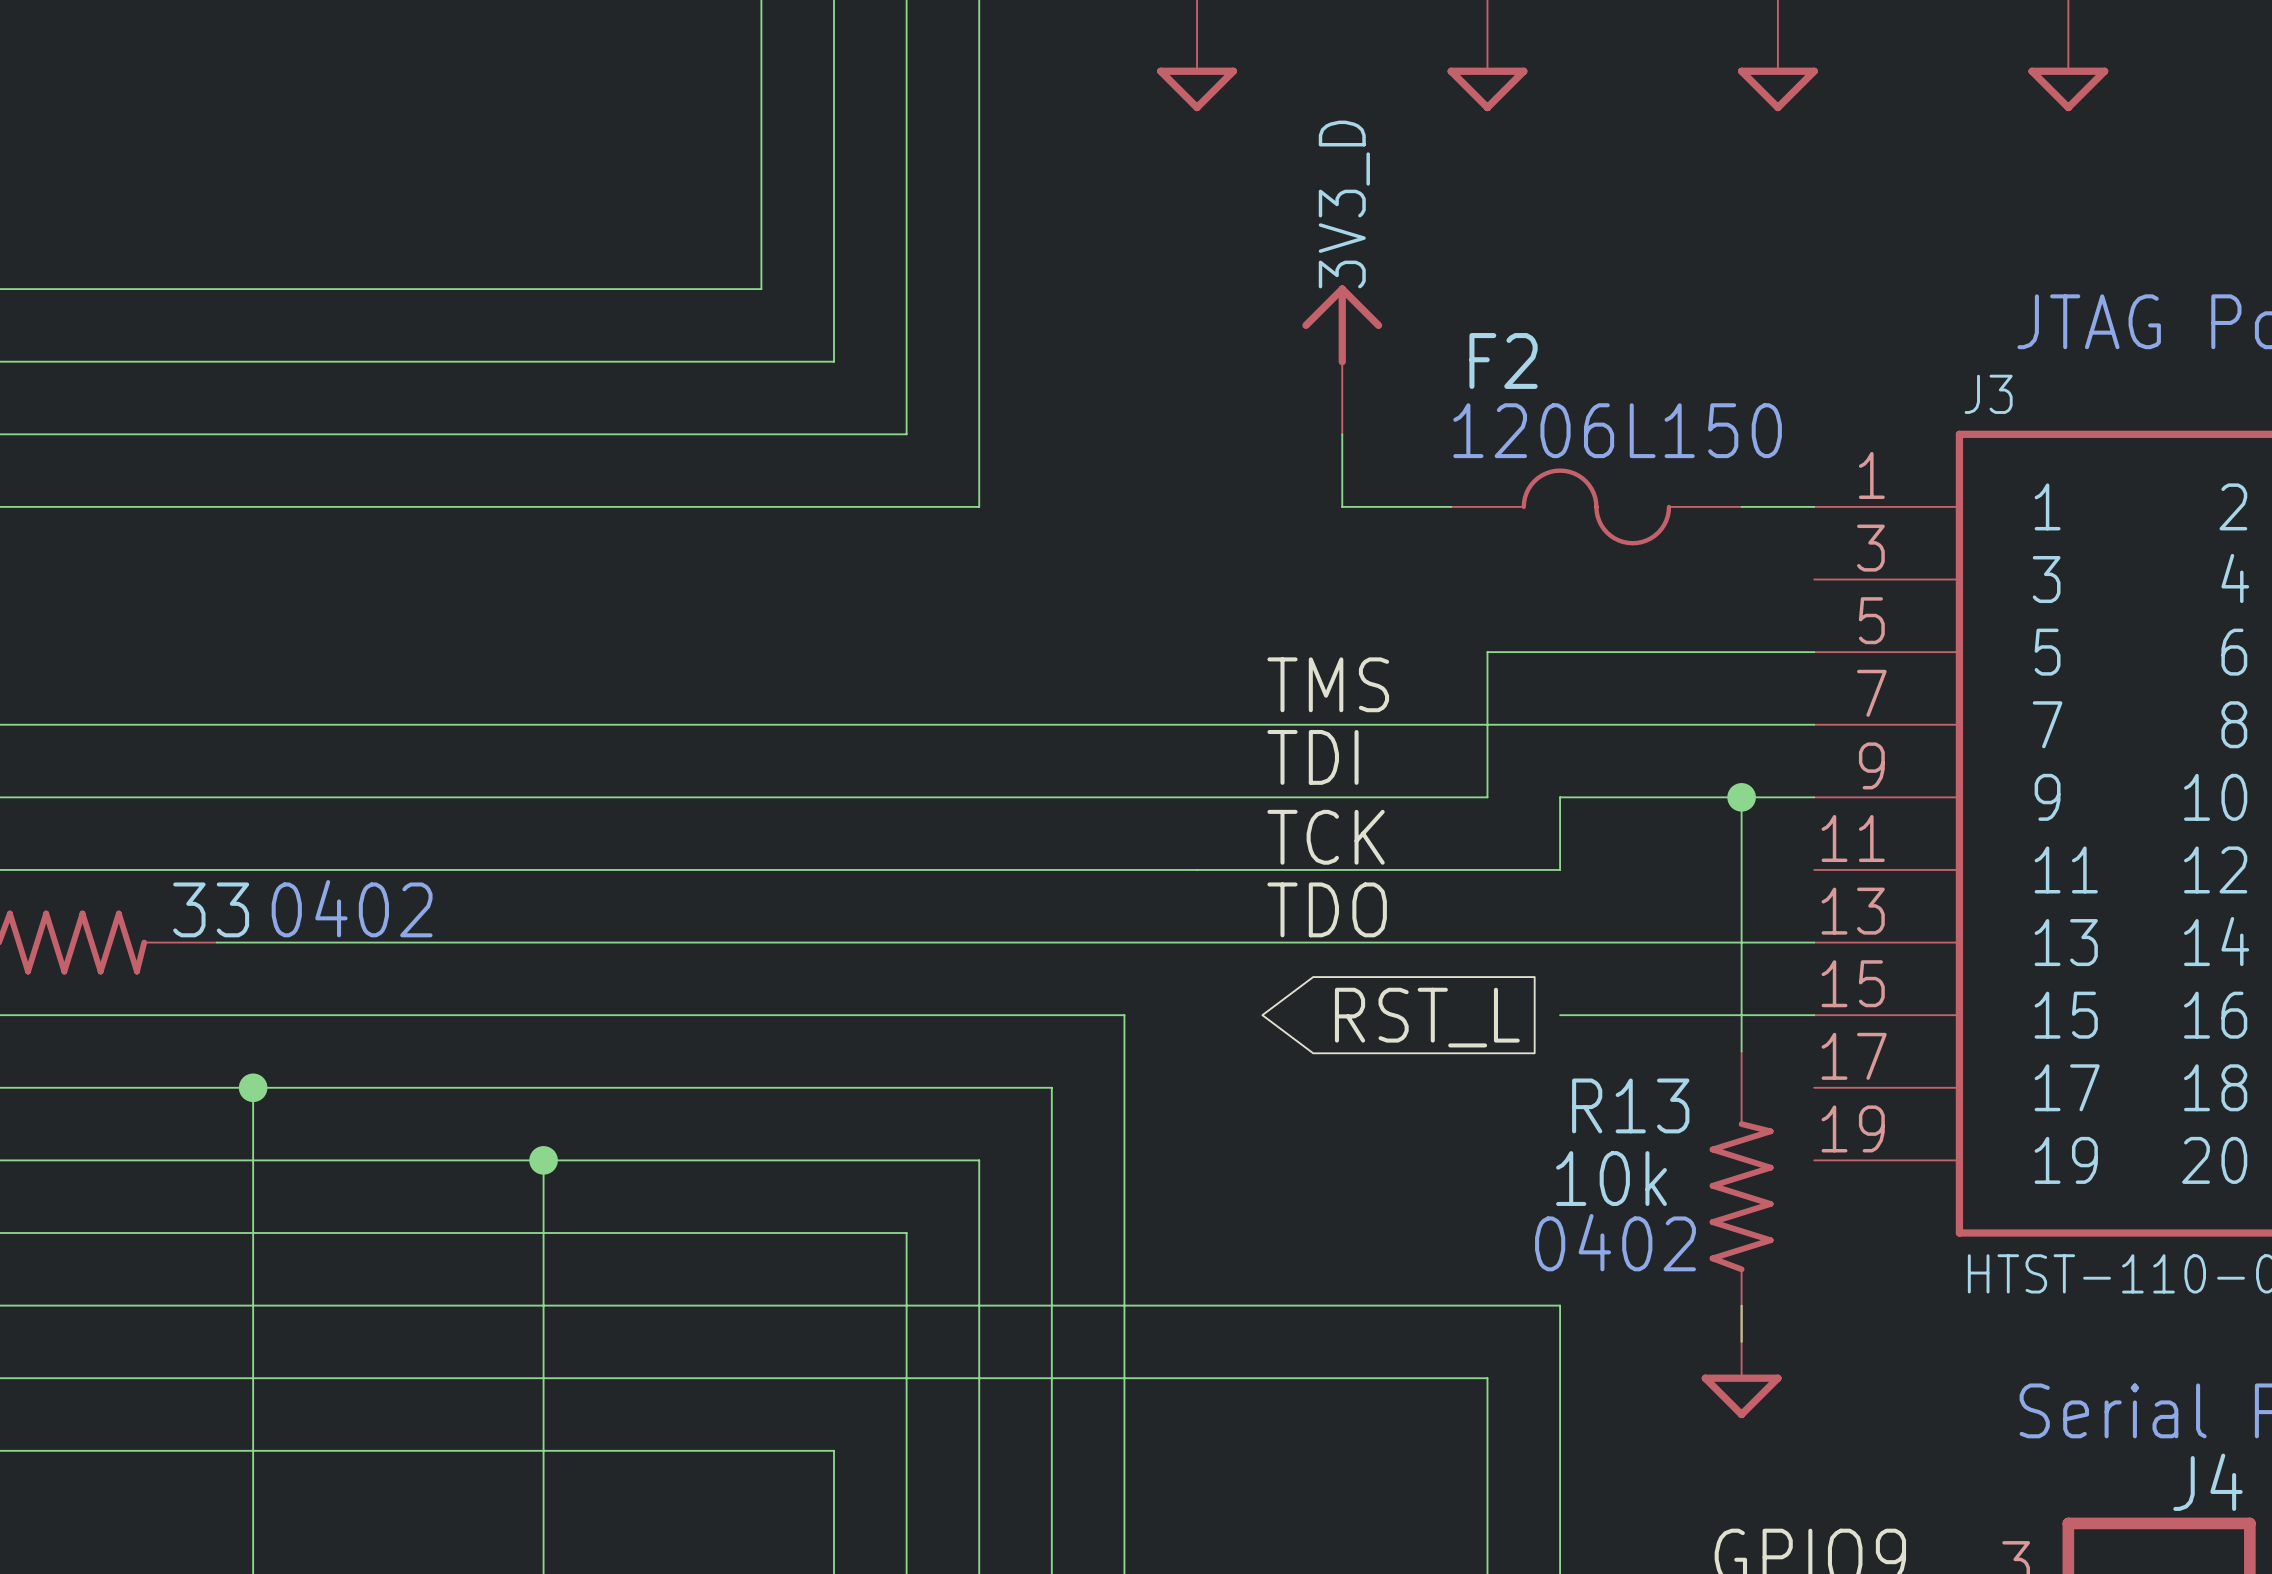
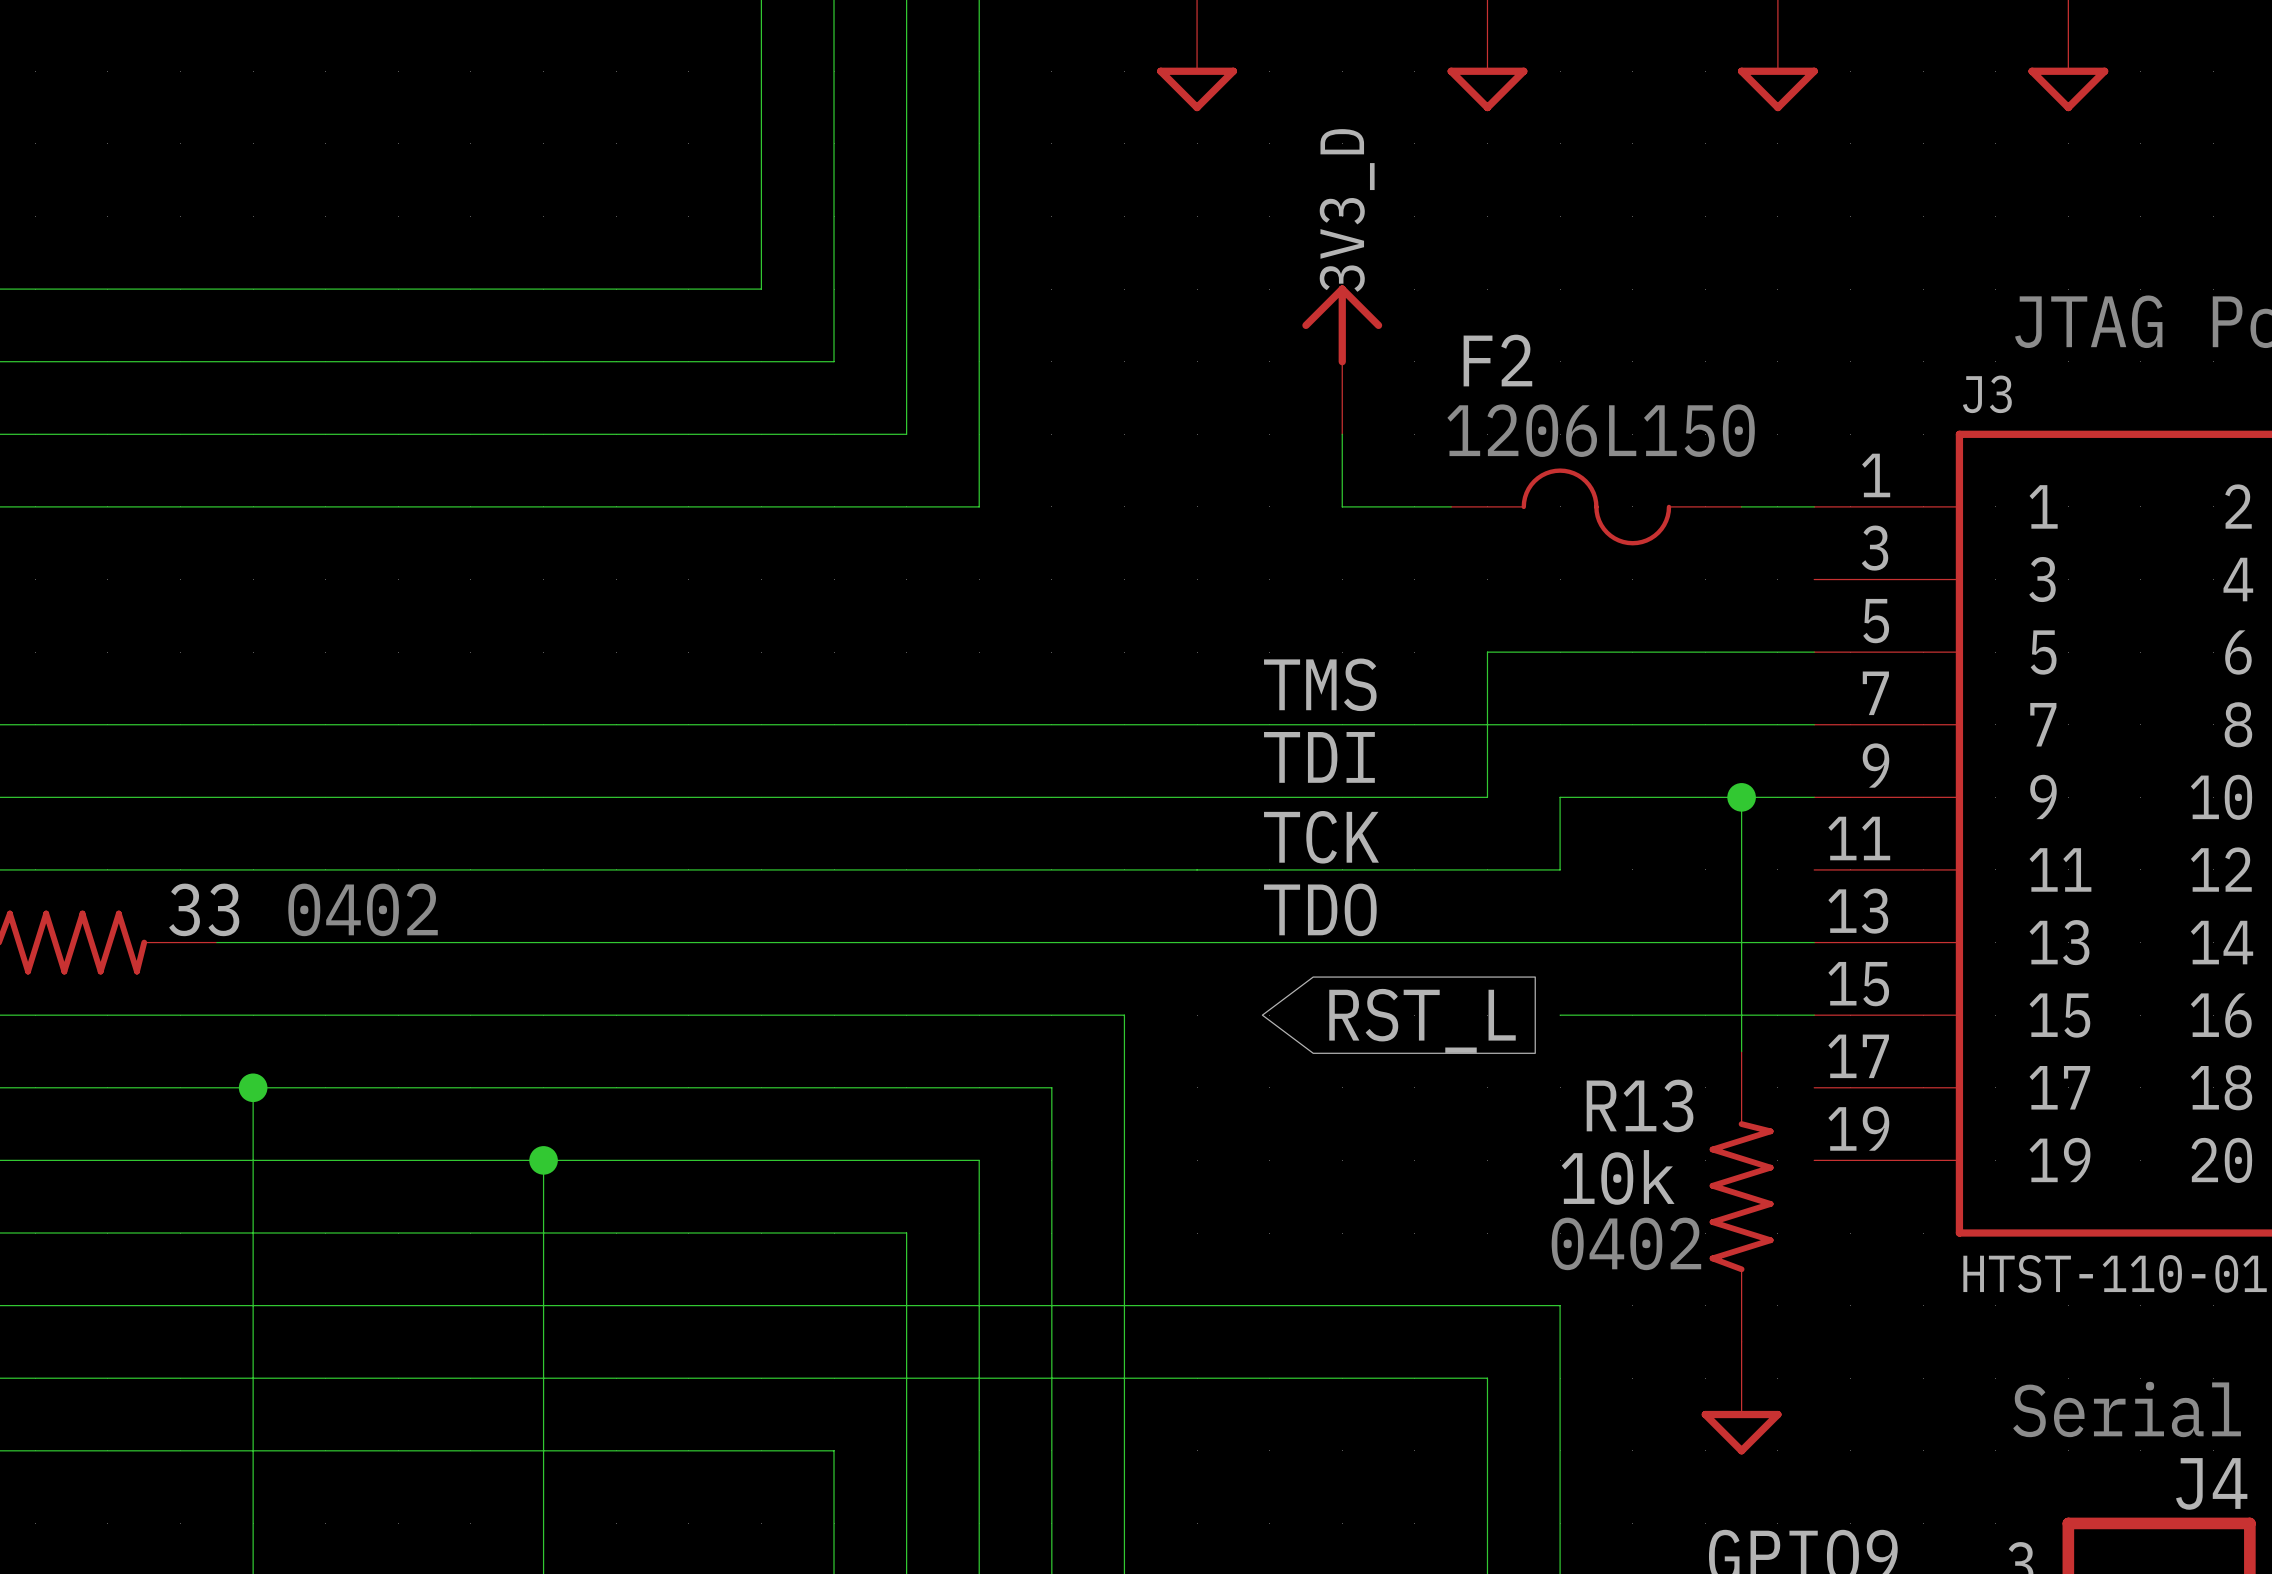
power symbol position: (1741, 1361) -> (1741, 1398)

